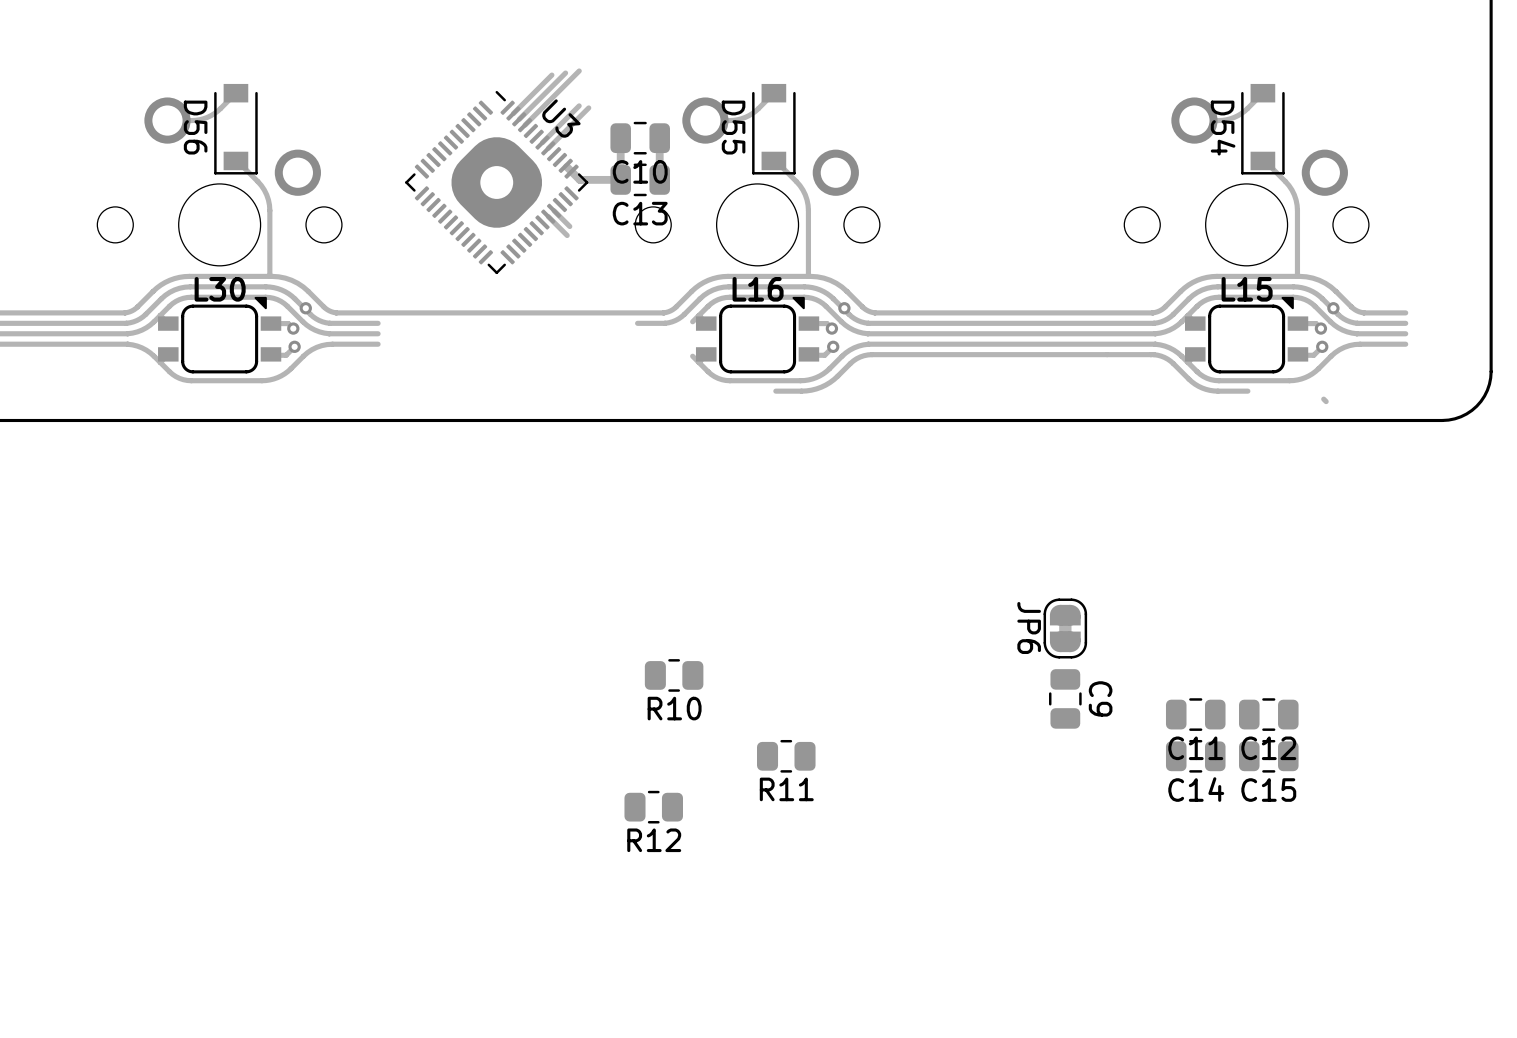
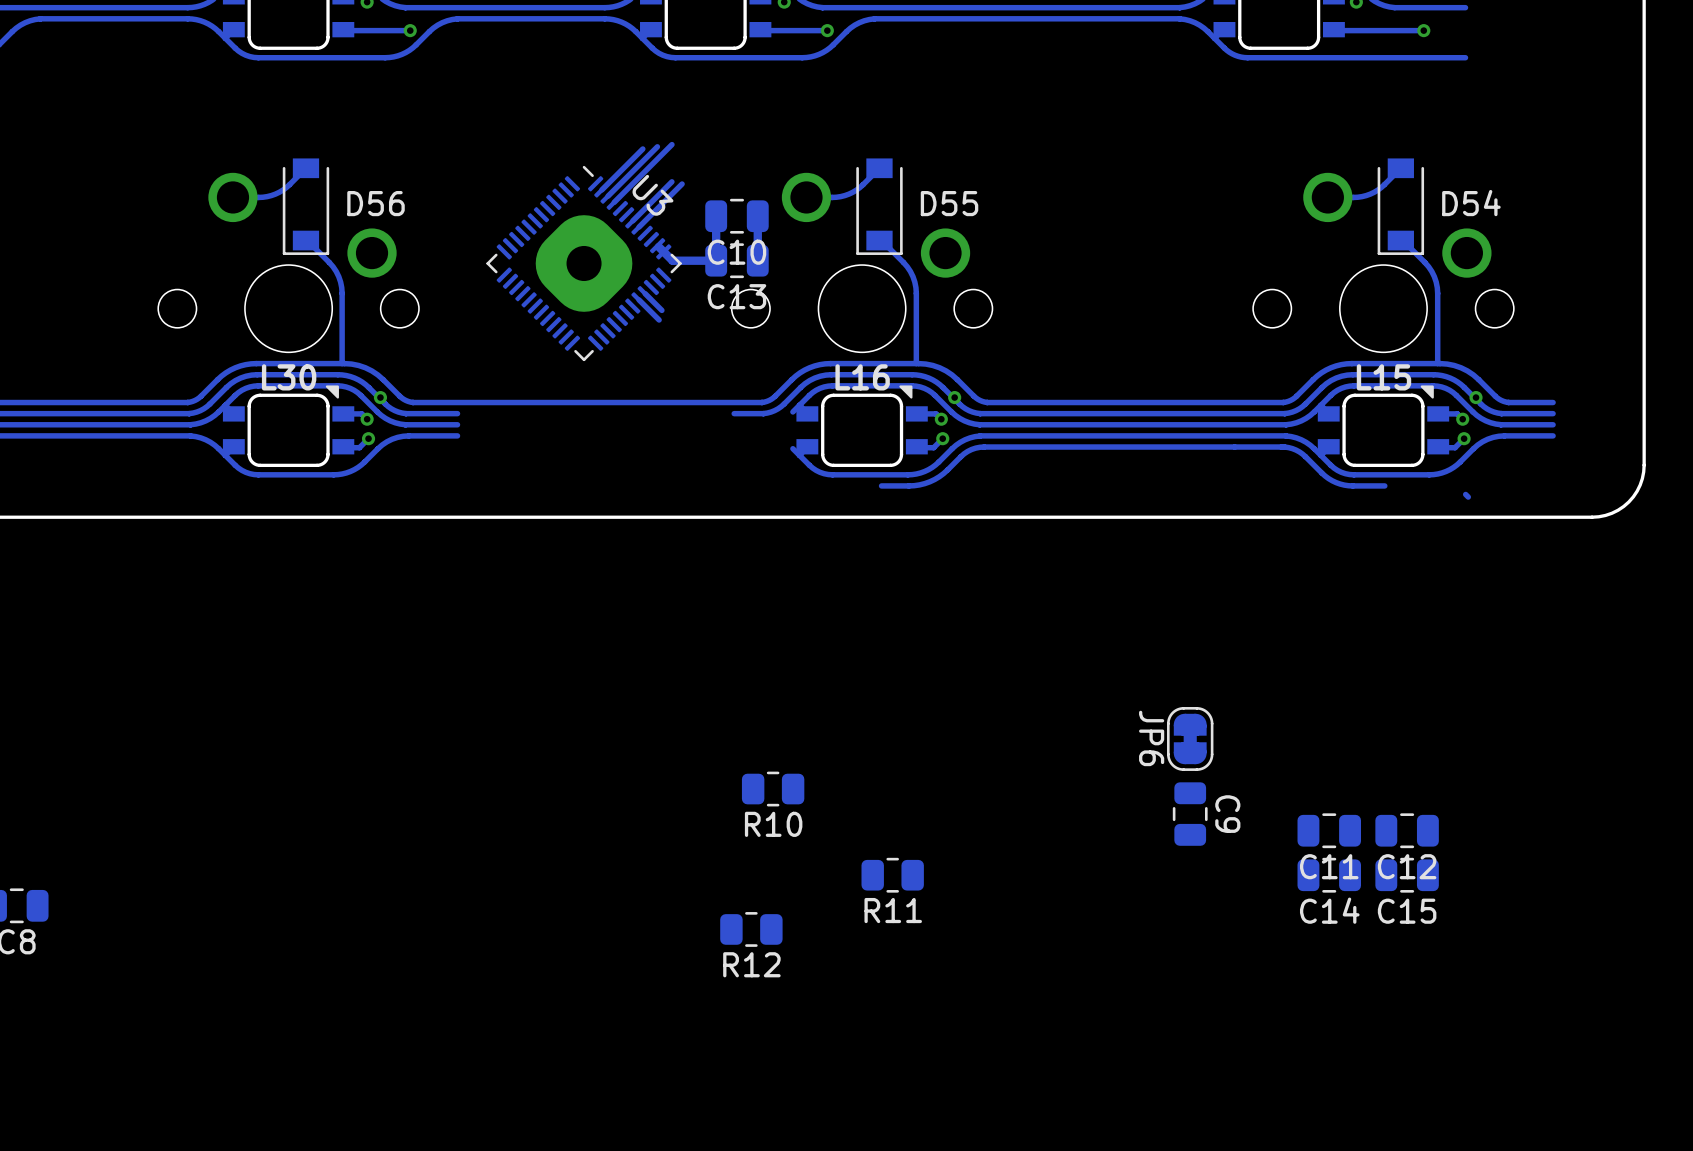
D56 name rotation: 0° (195, 127) -> 90° counterclockwise (376, 203)
D56 name position: D56 (195, 127) -> D56 (376, 203)
D55 name rotation: 0° (733, 127) -> 90° counterclockwise (949, 203)
D55 name position: D55 (733, 127) -> D55 (949, 203)
D54 name rotation: 0° (1223, 128) -> 90° counterclockwise (1471, 203)
D54 name position: D54 (1223, 128) -> D54 (1471, 203)

